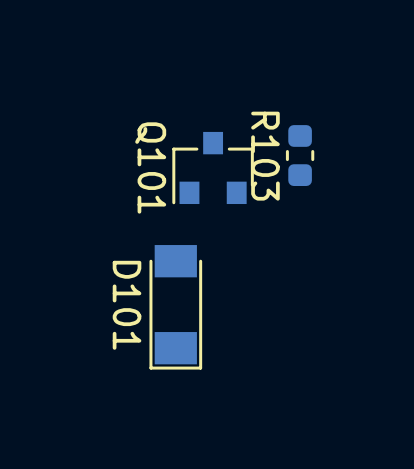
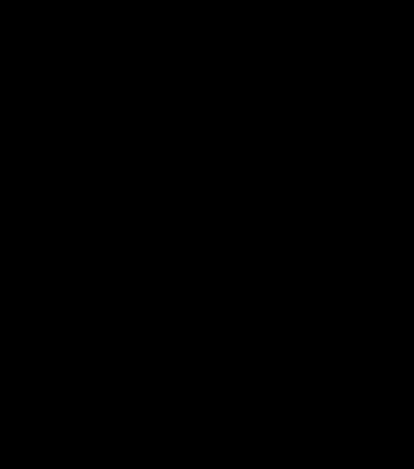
R103: (300, 155) -> none
Q101: (213, 168) -> none
D101: (175, 307) -> none

